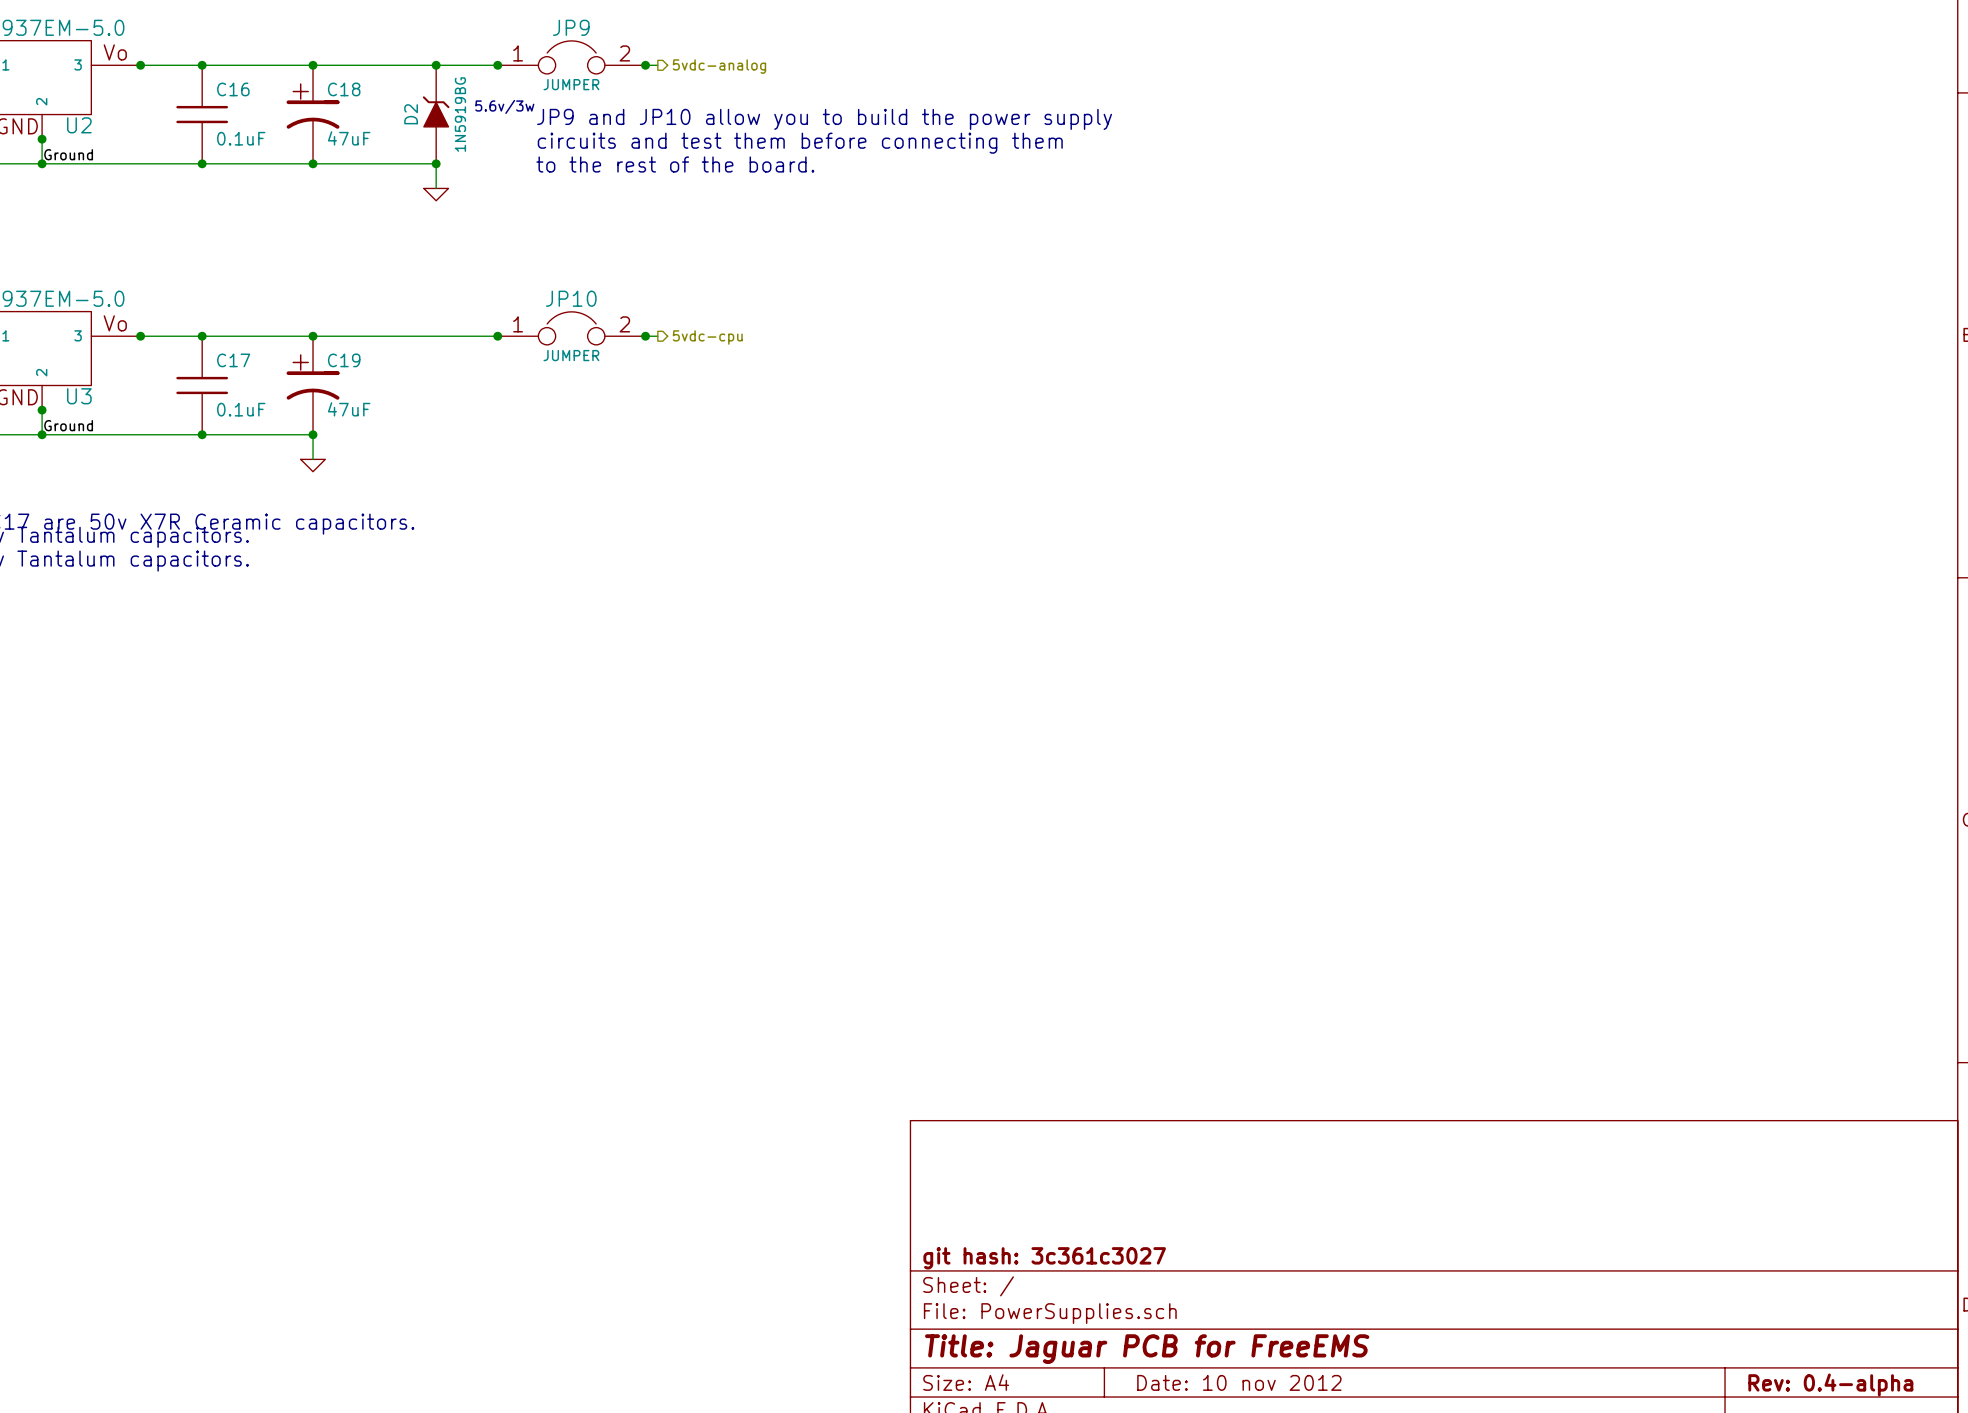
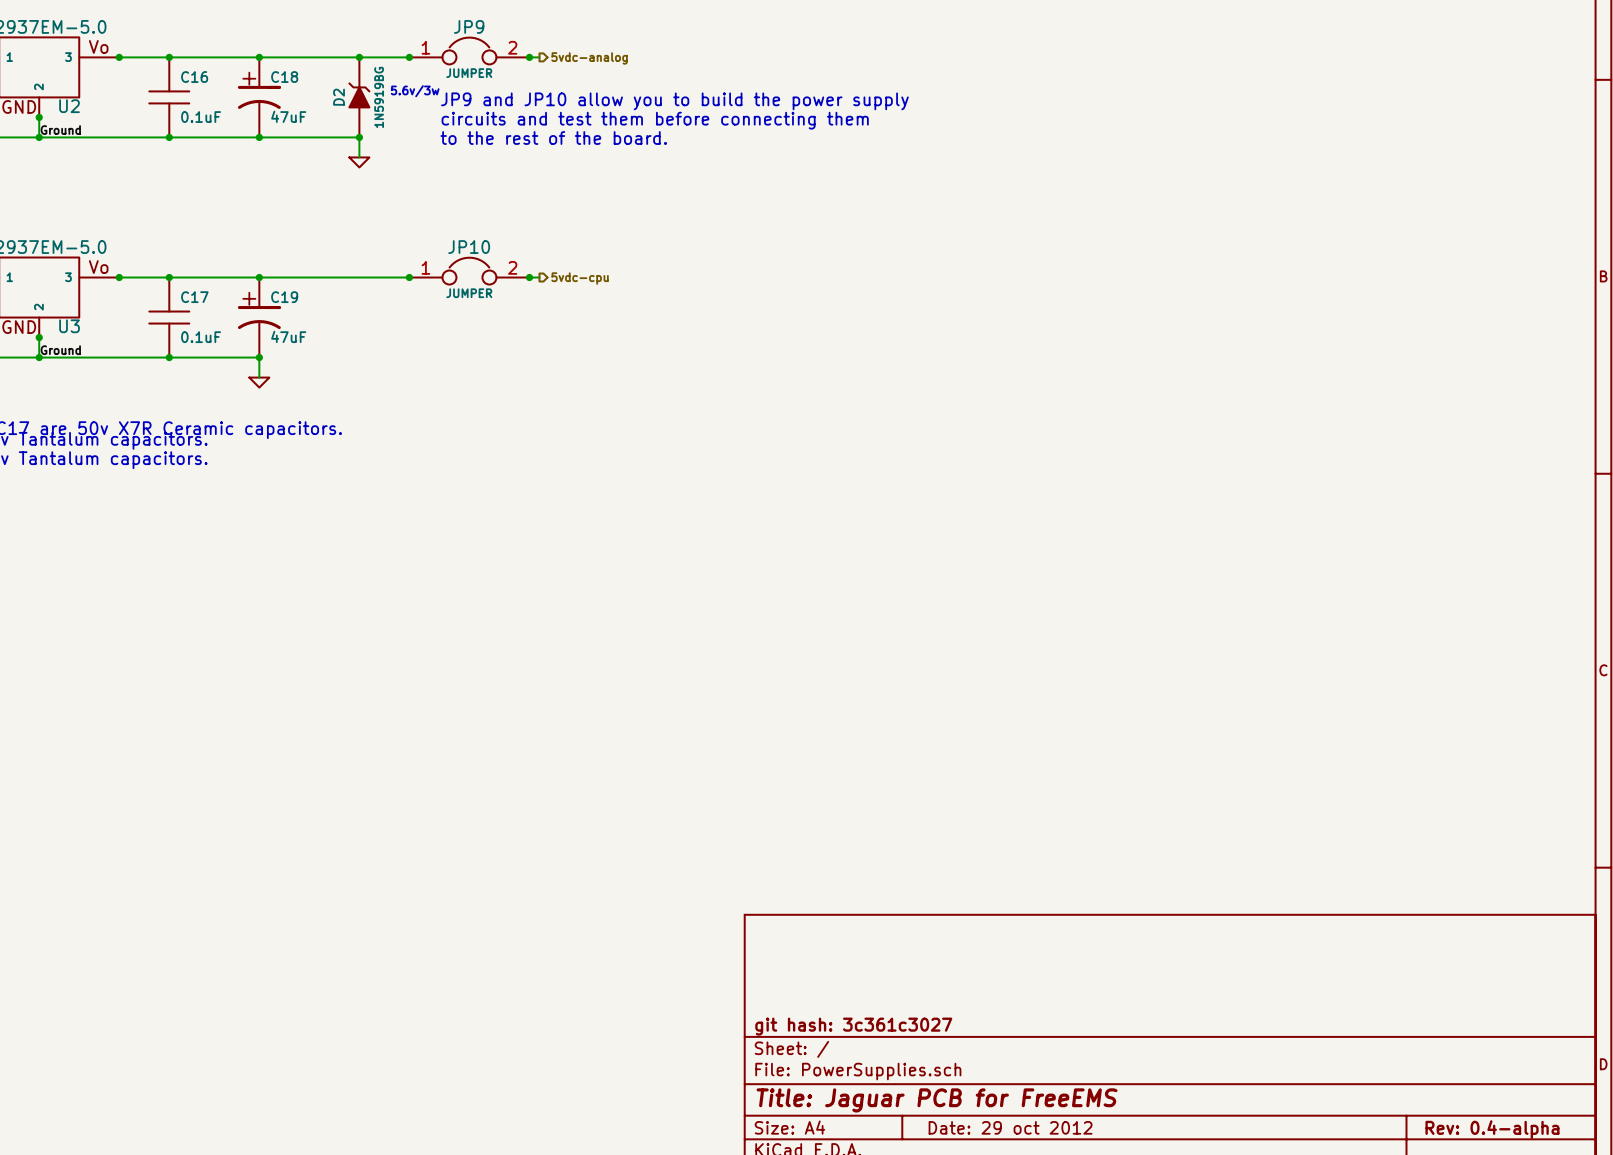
title block: Date: 10 nov 2012 (1239, 1382) -> Date: 29 oct 2012 (1010, 1127)

